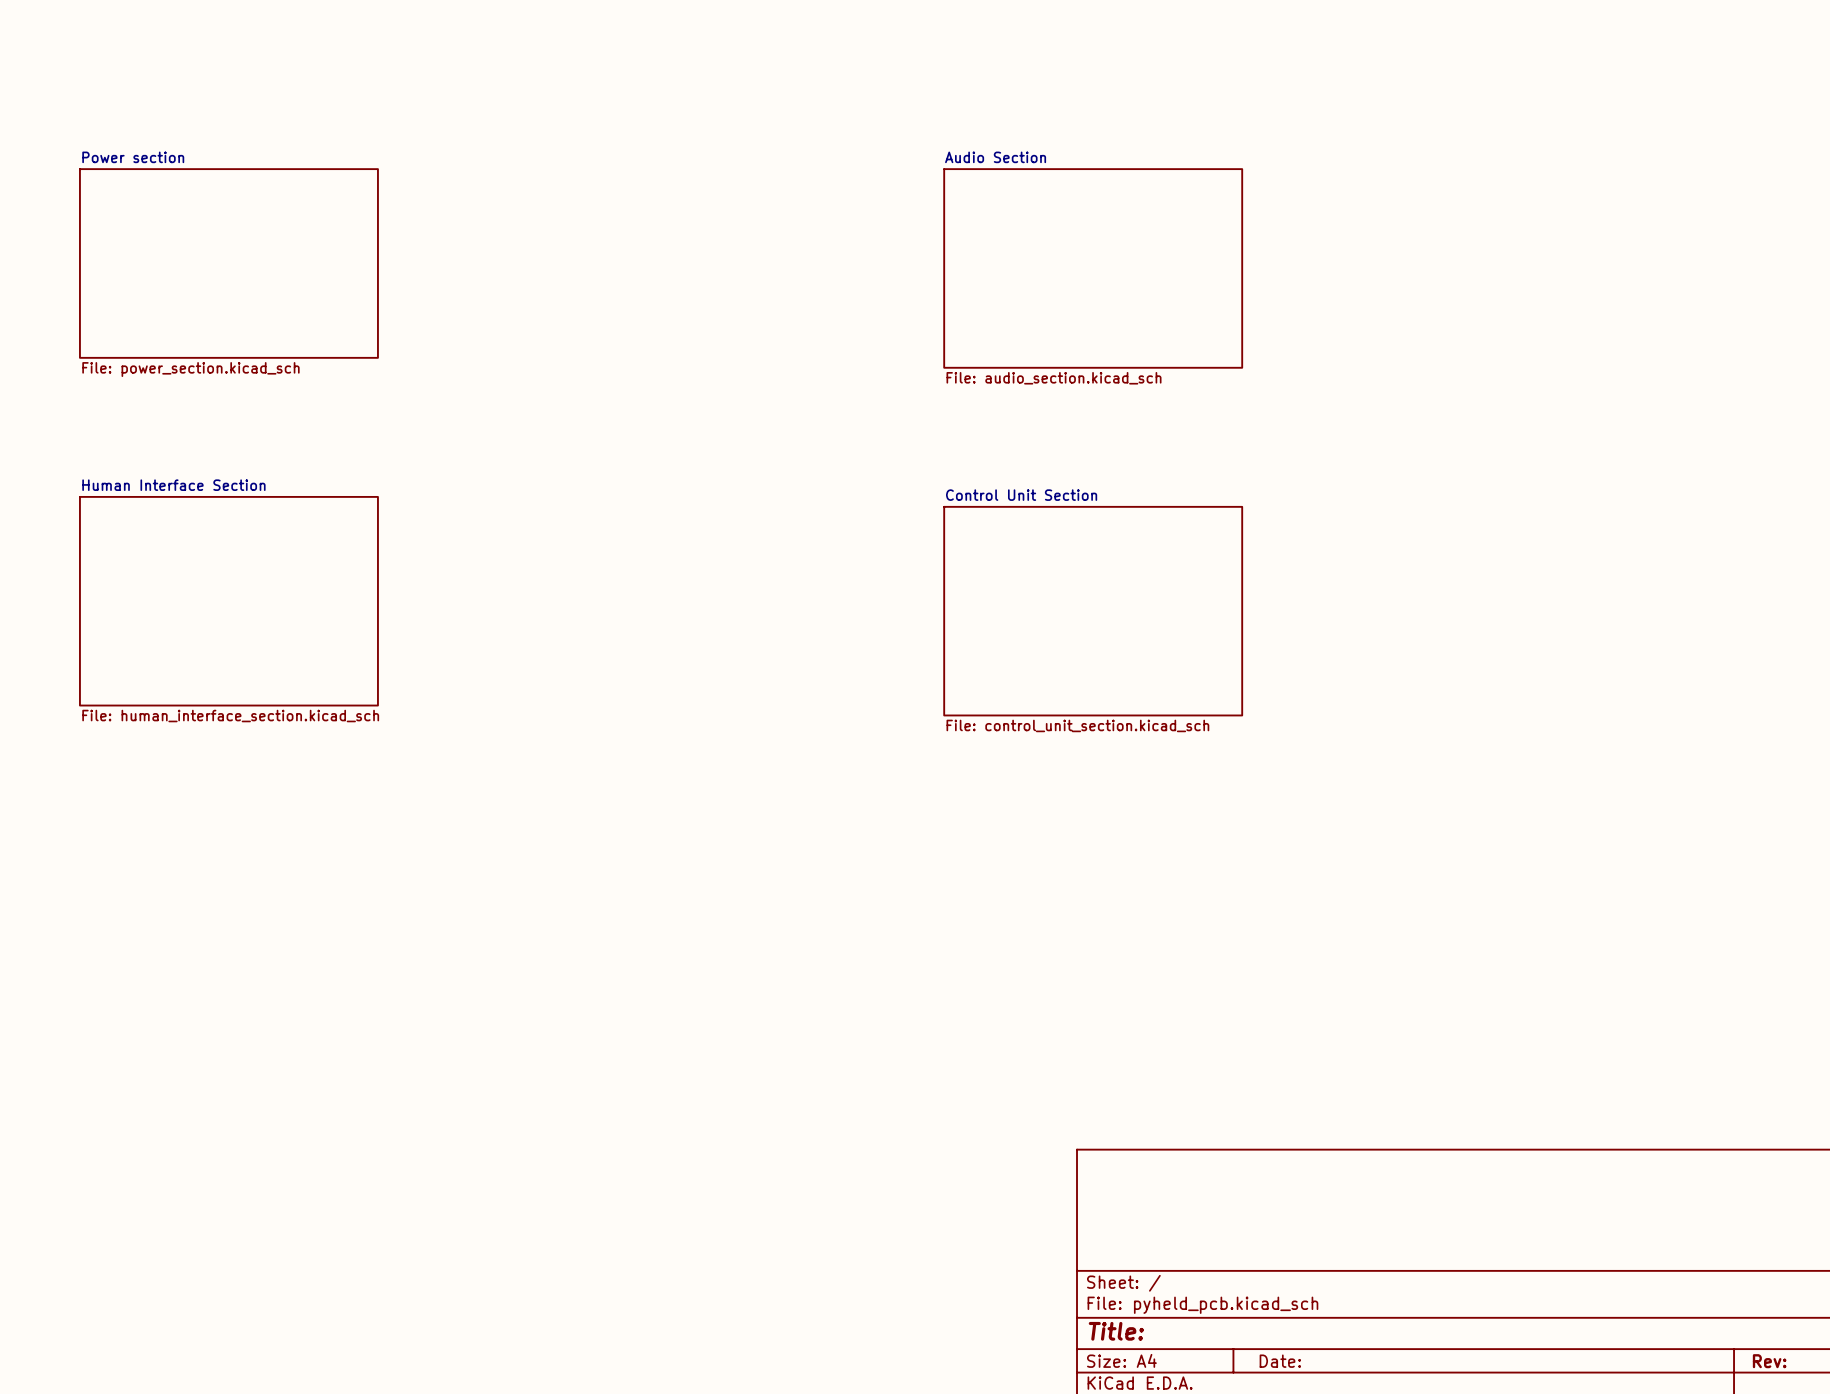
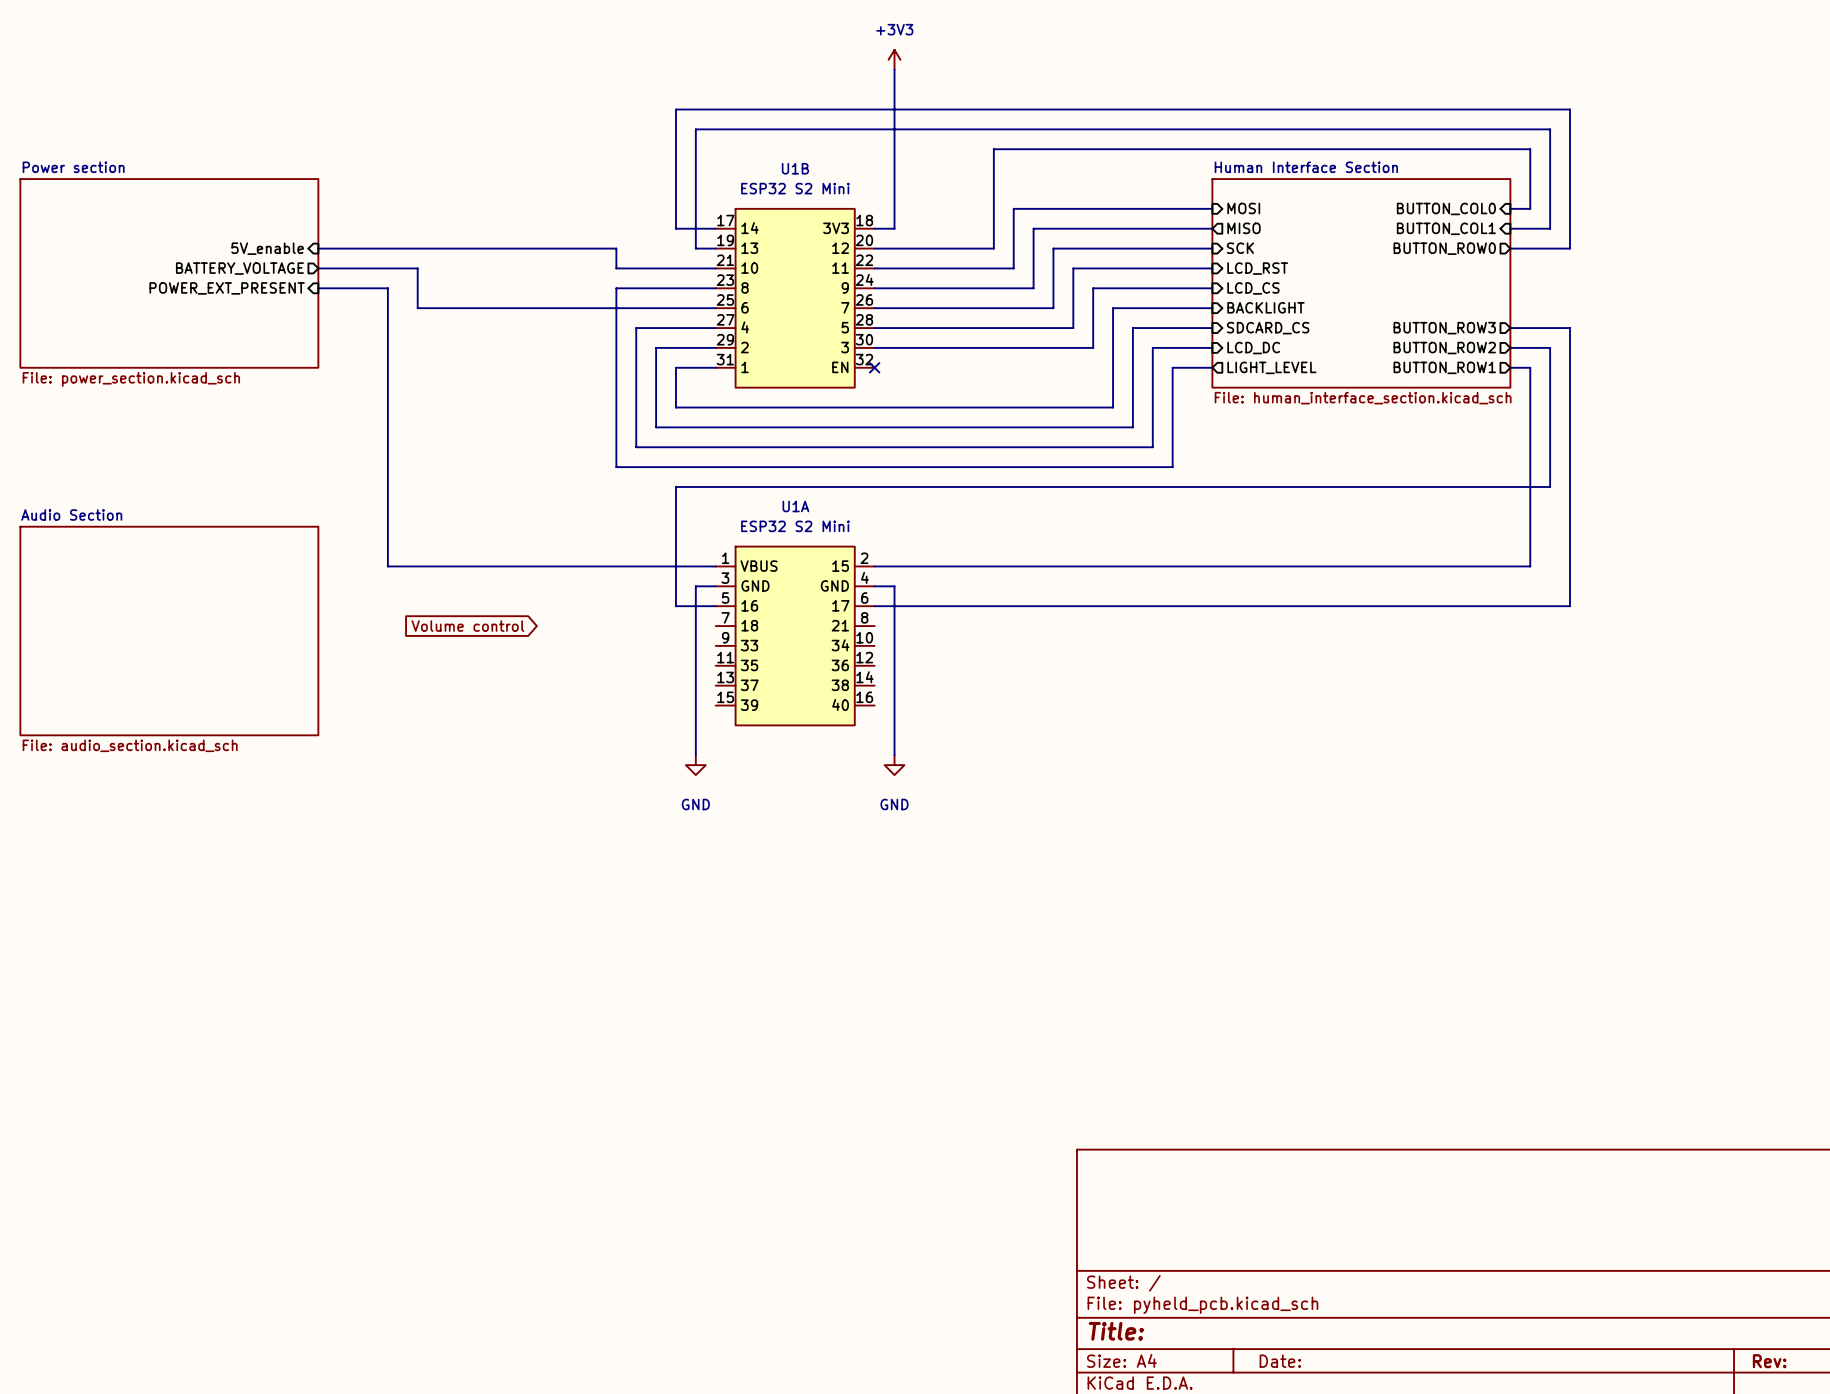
power symbol: none -> +3V3 (894, 59)
wire: none -> (894, 69) (894, 228) (874, 228)
wire: none -> (1212, 208) (1013, 208) (1013, 268) (874, 268)
sheet pin: none -> MOSI (1243, 208)
sheet pin: none -> BUTTON_COL0 (1446, 208)
wire: none -> (1510, 208) (1530, 208) (1530, 149) (993, 149) (993, 248) (874, 248)
wire: none -> (715, 228) (675, 228) (675, 109) (1570, 109) (1570, 248) (1510, 248)
wire: none -> (1212, 228) (1033, 228) (1033, 288) (874, 288)
sheet pin: none -> MISO (1244, 228)
sheet pin: none -> BUTTON_COL1 (1446, 228)
wire: none -> (1510, 228) (1550, 228) (1550, 129) (695, 129) (695, 248) (715, 248)
sheet pin: none -> 5V_enable (267, 248)
wire: none -> (318, 248) (616, 248) (616, 268) (715, 268)
wire: none -> (1212, 248) (1053, 248) (1053, 308) (874, 308)
sheet pin: none -> SCK (1240, 248)
sheet pin: none -> BUTTON_ROW0 (1444, 248)
sheet Power section position: (228, 263) -> (169, 273)
sheet pin: none -> BATTERY_VOLTAGE (239, 268)
wire: none -> (318, 268) (417, 268) (417, 308) (715, 308)
sheet Audio Section: File: audio_section.kicad_sch (1093, 268) -> none
wire: none -> (1212, 268) (1073, 268) (1073, 328) (874, 328)
sheet pin: none -> LCD_RST (1257, 268)
sheet Human Interface Section: none -> File: human_interface_section.kicad_sch (1361, 283)
sheet pin: none -> POWER_EXT_PRESENT (227, 288)
wire: none -> (318, 288) (387, 288) (387, 566) (715, 566)
wire: none -> (715, 288) (616, 288) (616, 467) (1172, 467) (1172, 367) (1212, 367)
wire: none -> (1212, 288) (1093, 288) (1093, 347) (874, 347)
sheet pin: none -> LCD_CS (1253, 288)
U1B: none -> ESP32 S2 Mini (795, 298)
sheet pin: none -> BACKLIGHT (1266, 307)
wire: none -> (1212, 308) (1113, 308) (1113, 407) (675, 407) (675, 367) (715, 367)
wire: none -> (715, 328) (636, 328) (636, 447) (1152, 447) (1152, 347) (1212, 347)
wire: none -> (1212, 328) (1132, 328) (1132, 427) (656, 427) (656, 347) (715, 347)
sheet pin: none -> SDCARD_CS (1268, 328)
sheet pin: none -> BUTTON_ROW3 (1444, 328)
wire: none -> (1510, 328) (1570, 328) (1570, 606) (874, 606)
wire: none -> (1510, 347) (1550, 347) (1550, 486) (675, 486) (675, 606) (715, 606)
sheet pin: none -> LCD_DC (1253, 348)
sheet pin: none -> BUTTON_ROW2 (1444, 348)
no-connect mark: none -> (874, 367)
sheet pin: none -> LIGHT_LEVEL (1271, 367)
sheet pin: none -> BUTTON_ROW1 (1444, 367)
wire: none -> (1510, 367) (1530, 367) (1530, 566) (874, 566)
wire: none -> (715, 586) (695, 586) (695, 755)
wire: none -> (874, 586) (894, 586) (894, 755)
sheet Human Interface Section: File: human_interface_section.kicad_sch (228, 601) -> none
sheet Control Unit Section: File: control_unit_section.kicad_sch (1093, 611) -> none
global label: none -> Volume control (467, 626)
sheet Audio Section: none -> File: audio_section.kicad_sch (169, 631)
U1A: none -> ESP32 S2 Mini (795, 635)
power symbol: none -> GND (695, 765)
power symbol: none -> GND (894, 765)

